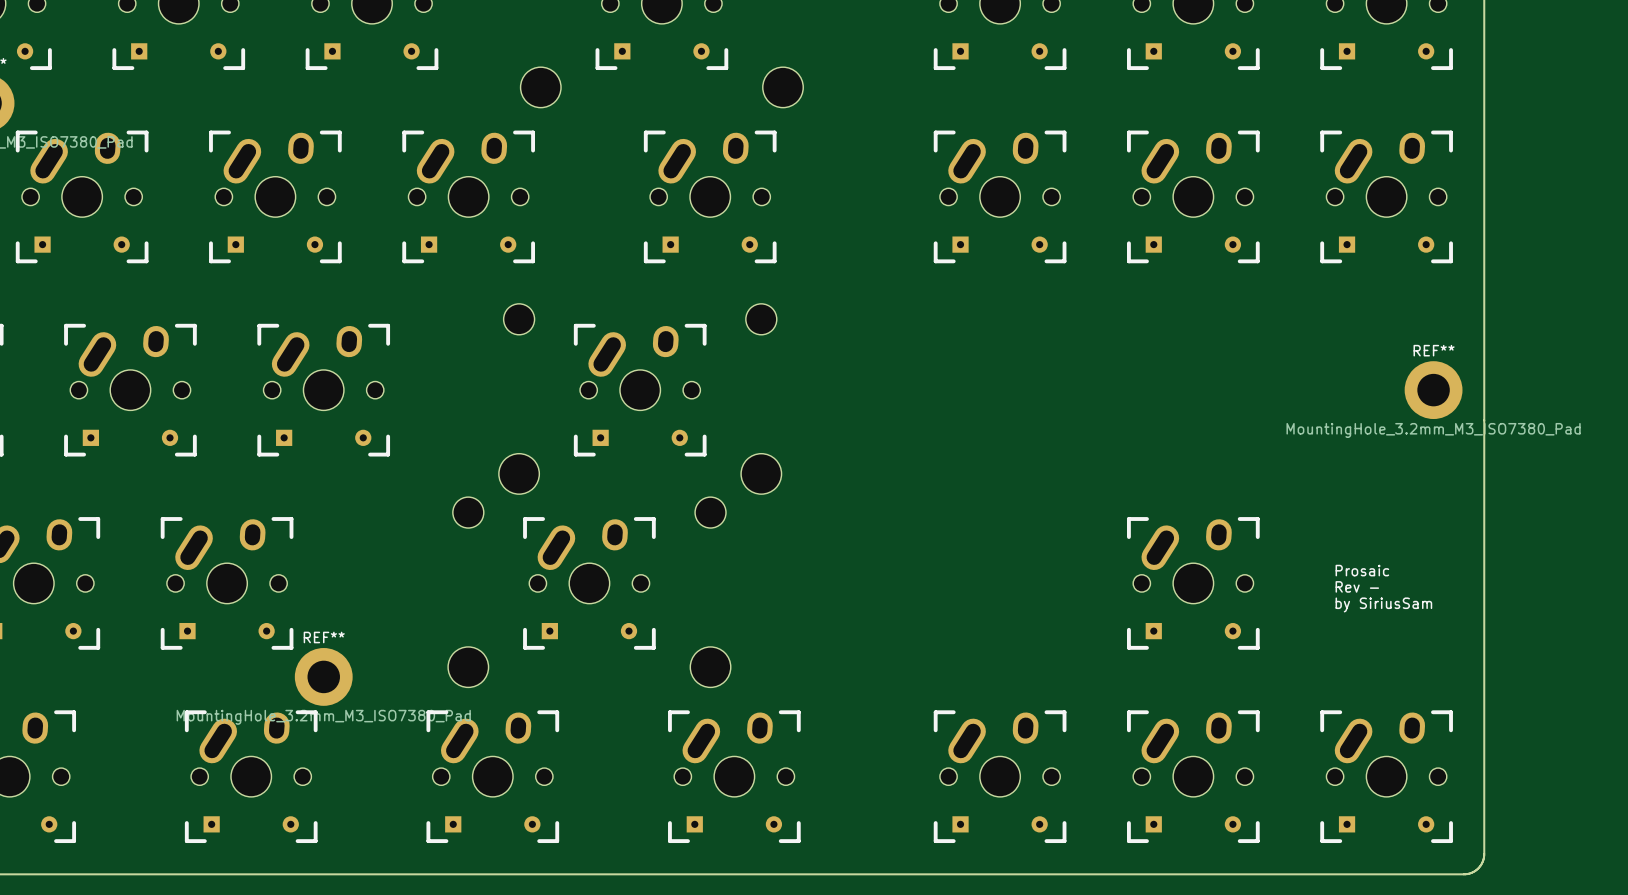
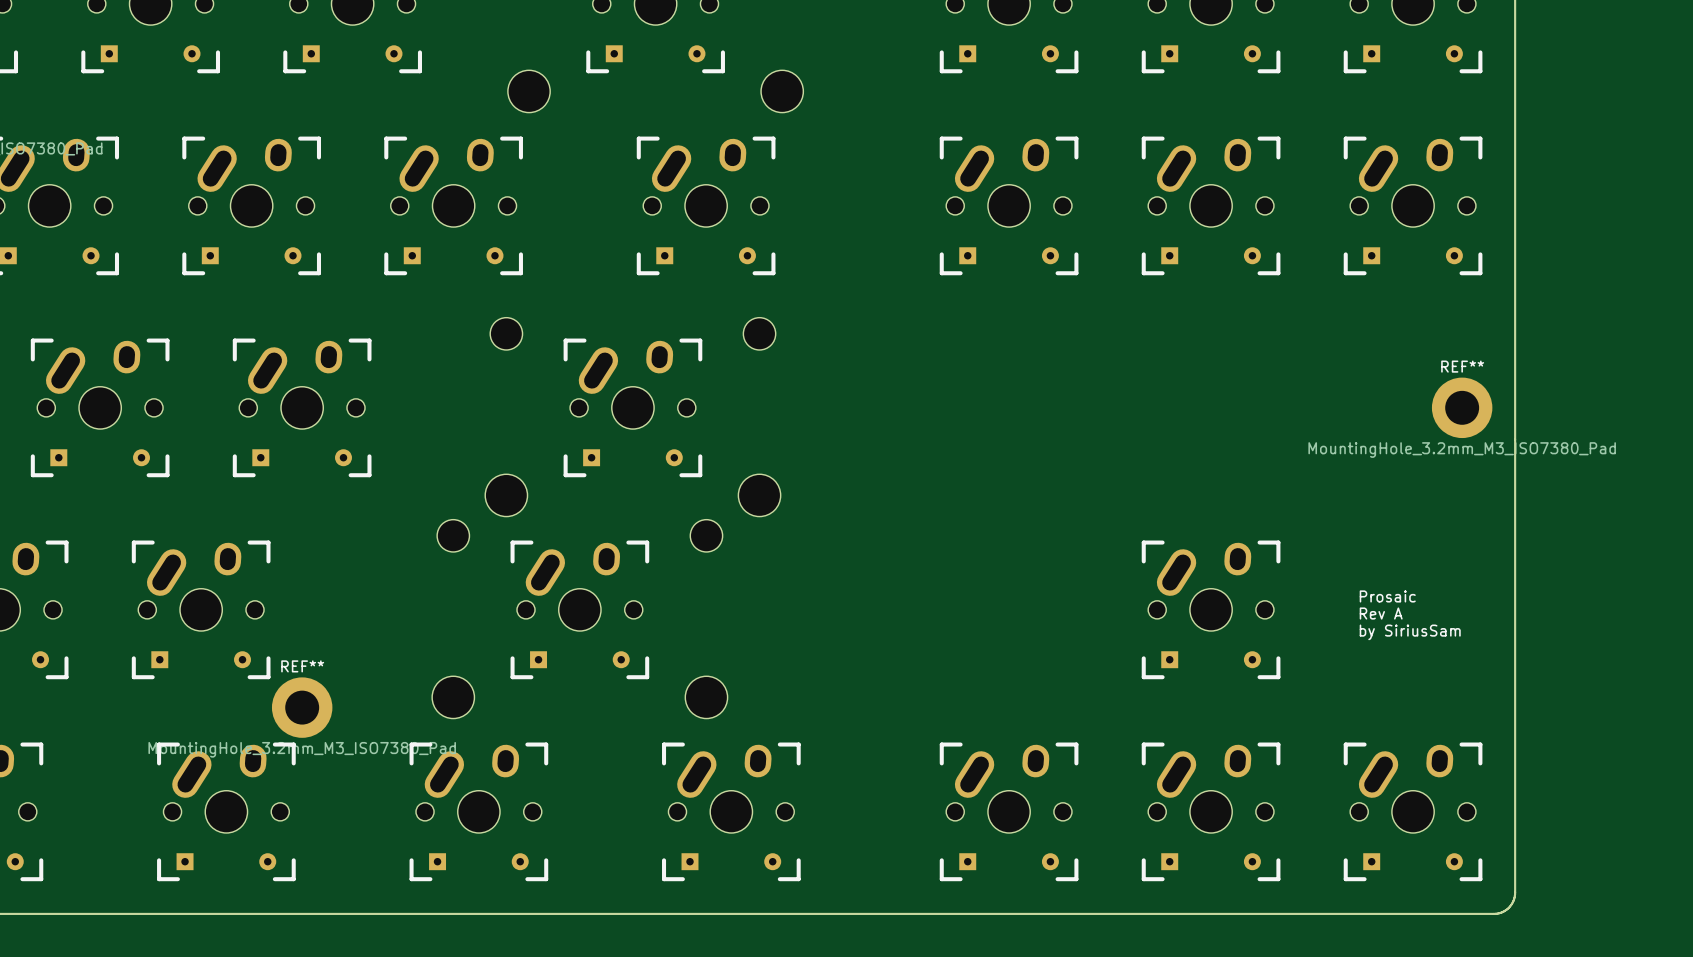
text: Rev - (1357, 586) -> Rev A (1381, 613)

